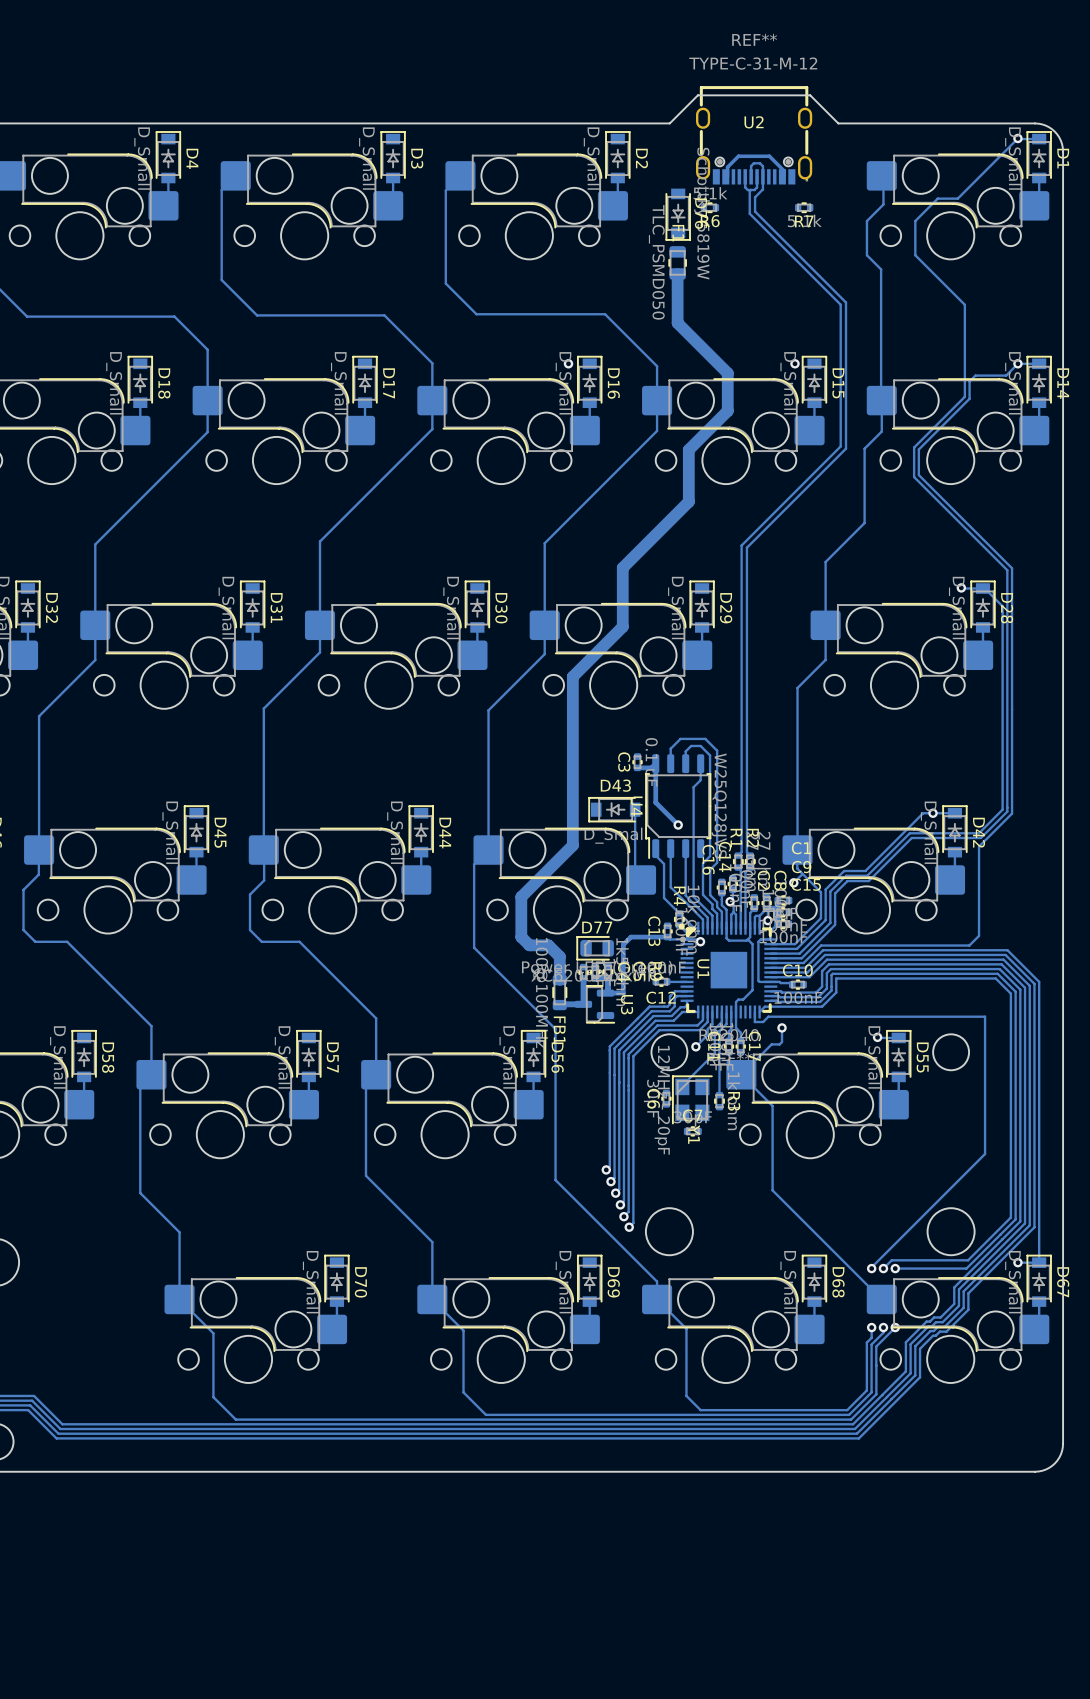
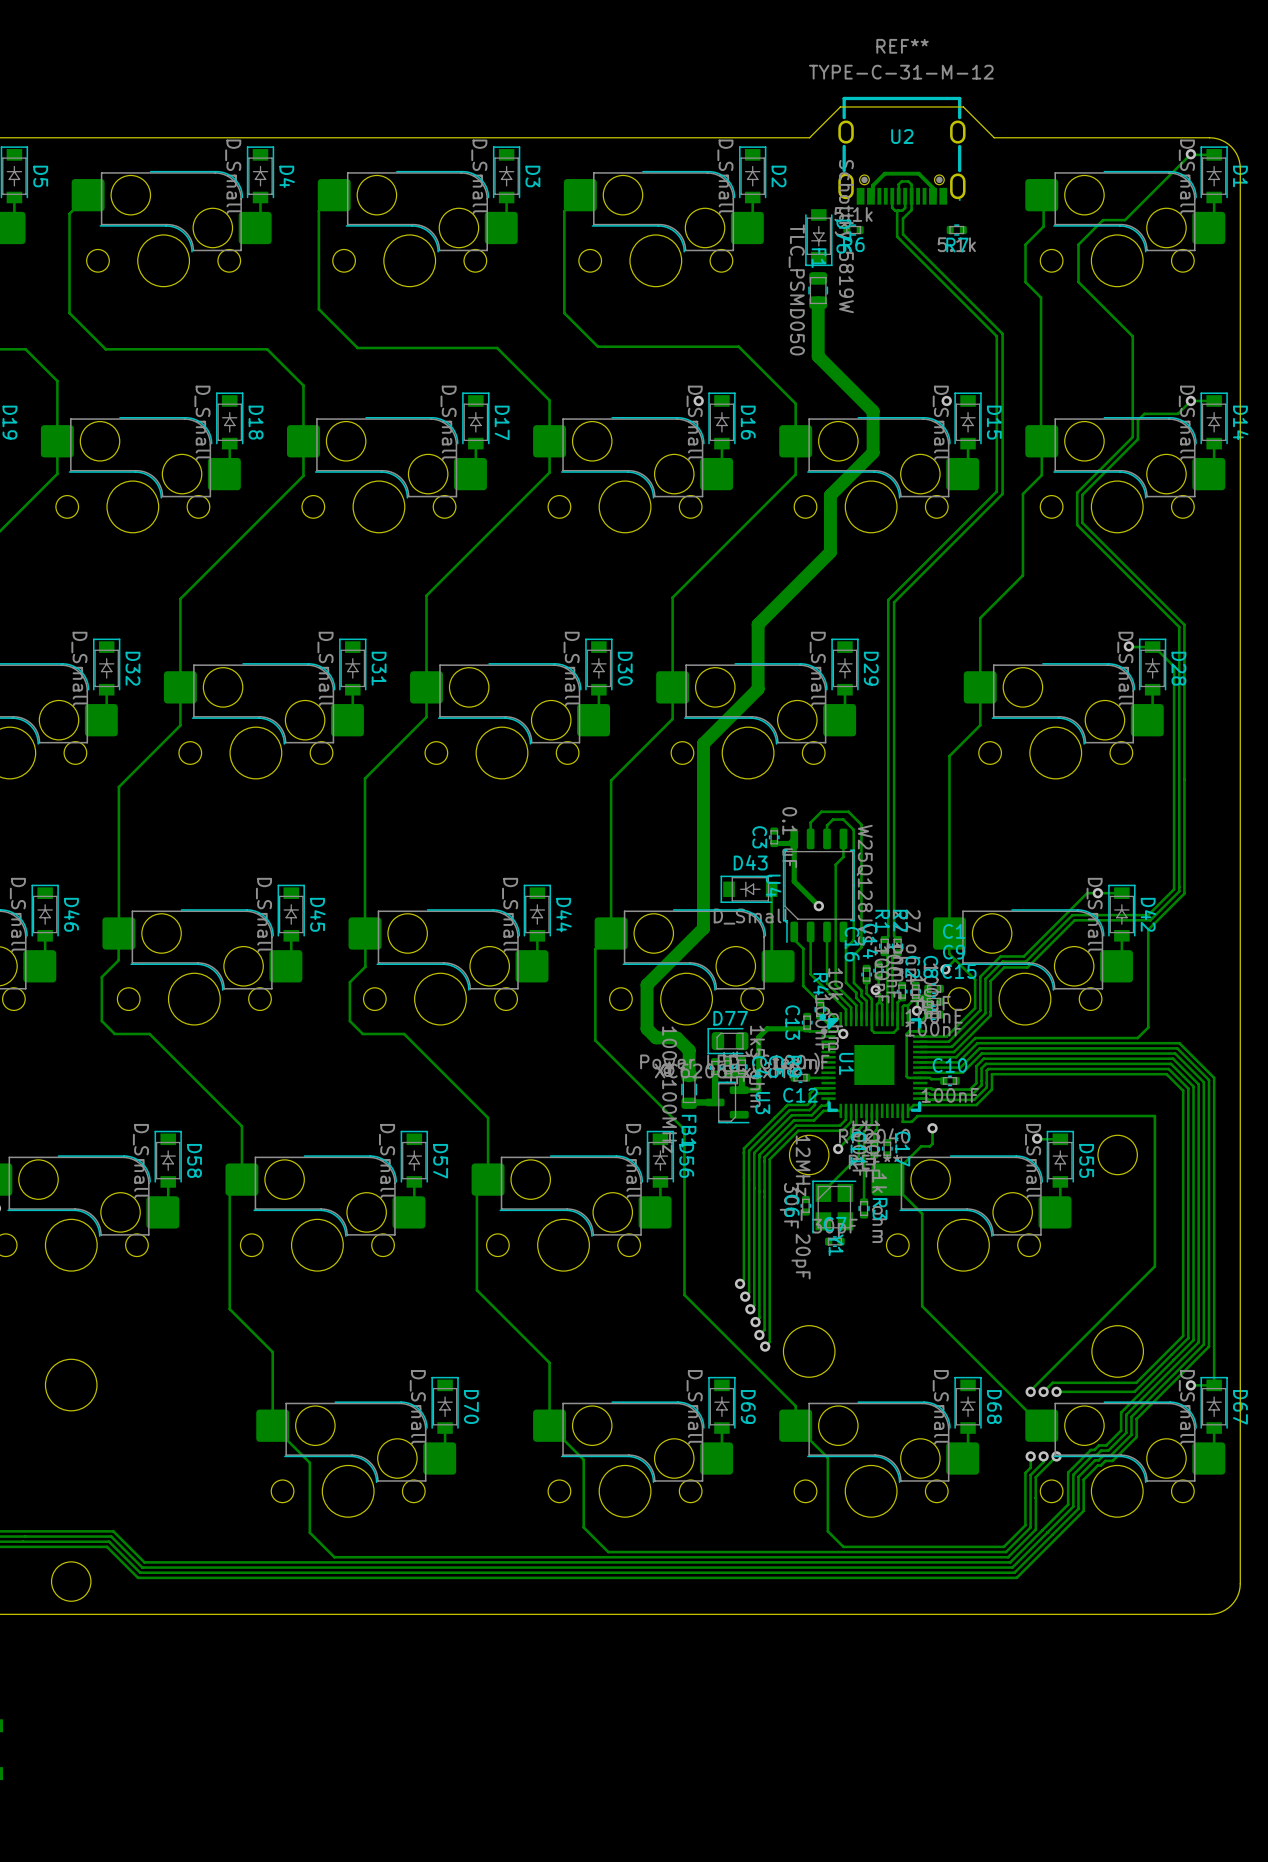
track: (747, 939) (752, 944) (752, 990) (743, 999) (736, 1001) (736, 1027) (740, 1032) (740, 1040) -> none

